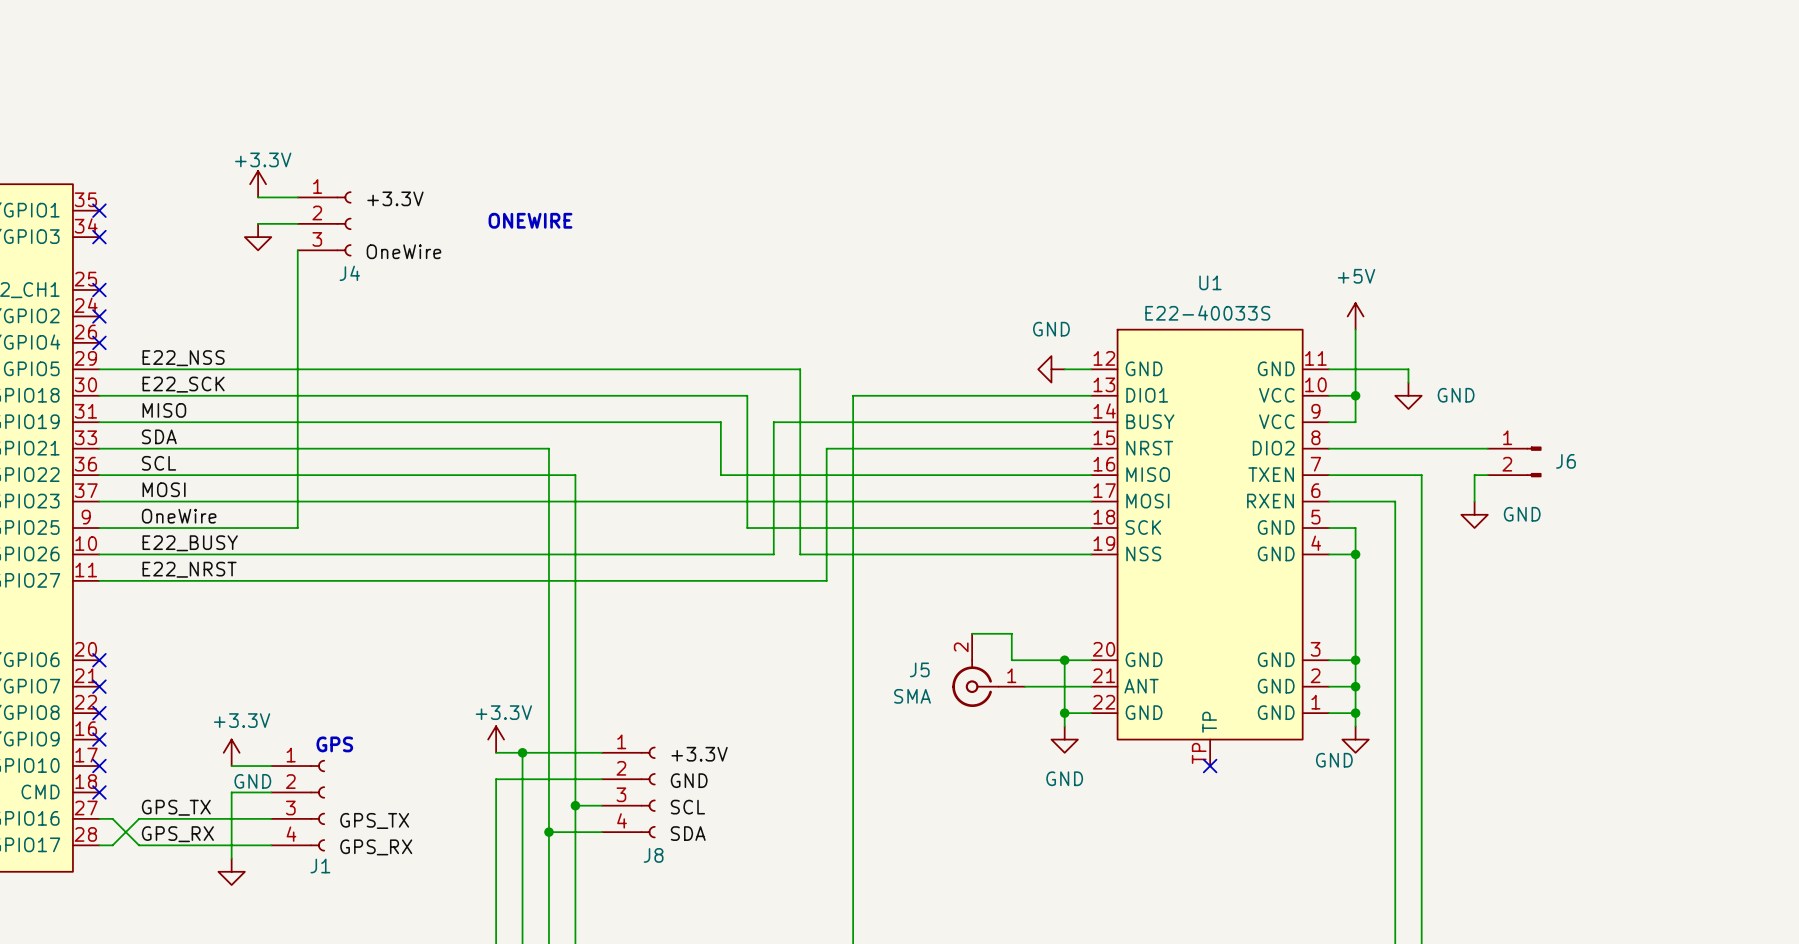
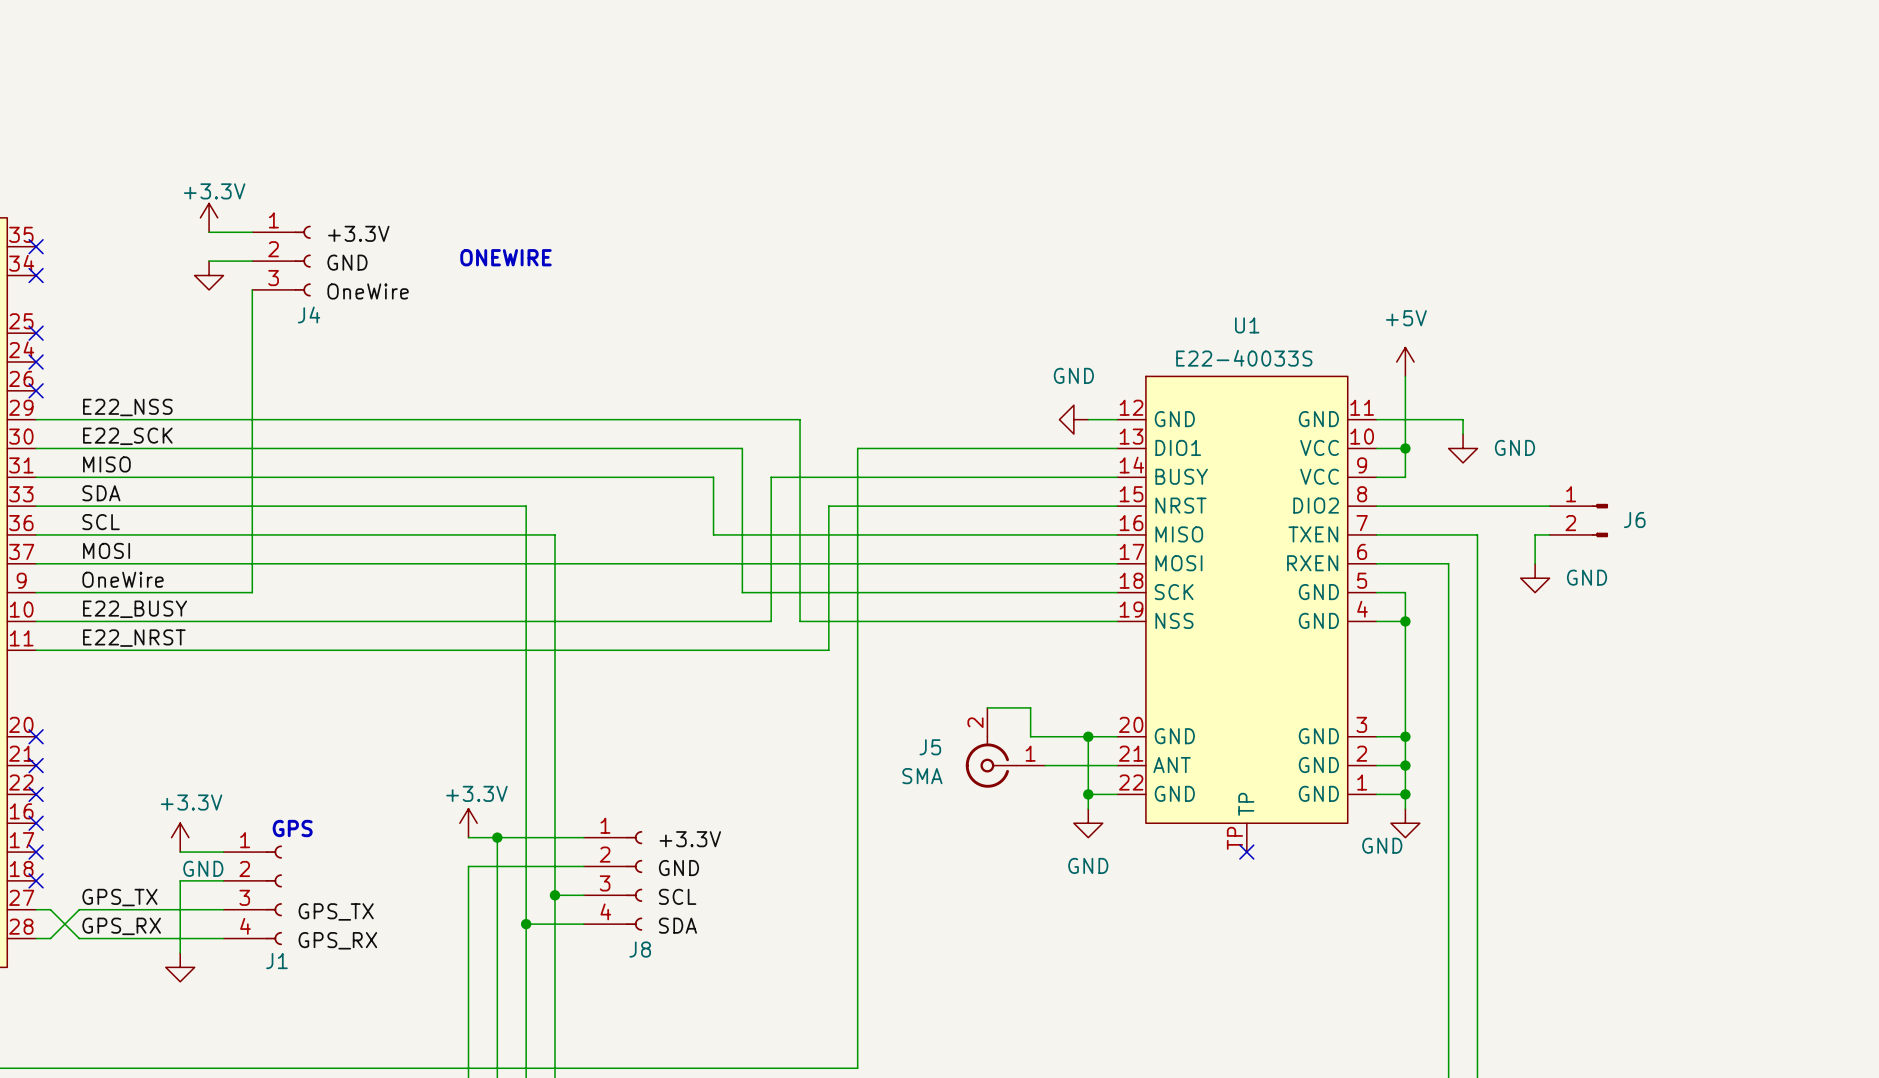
label: none -> GND (347, 262)

